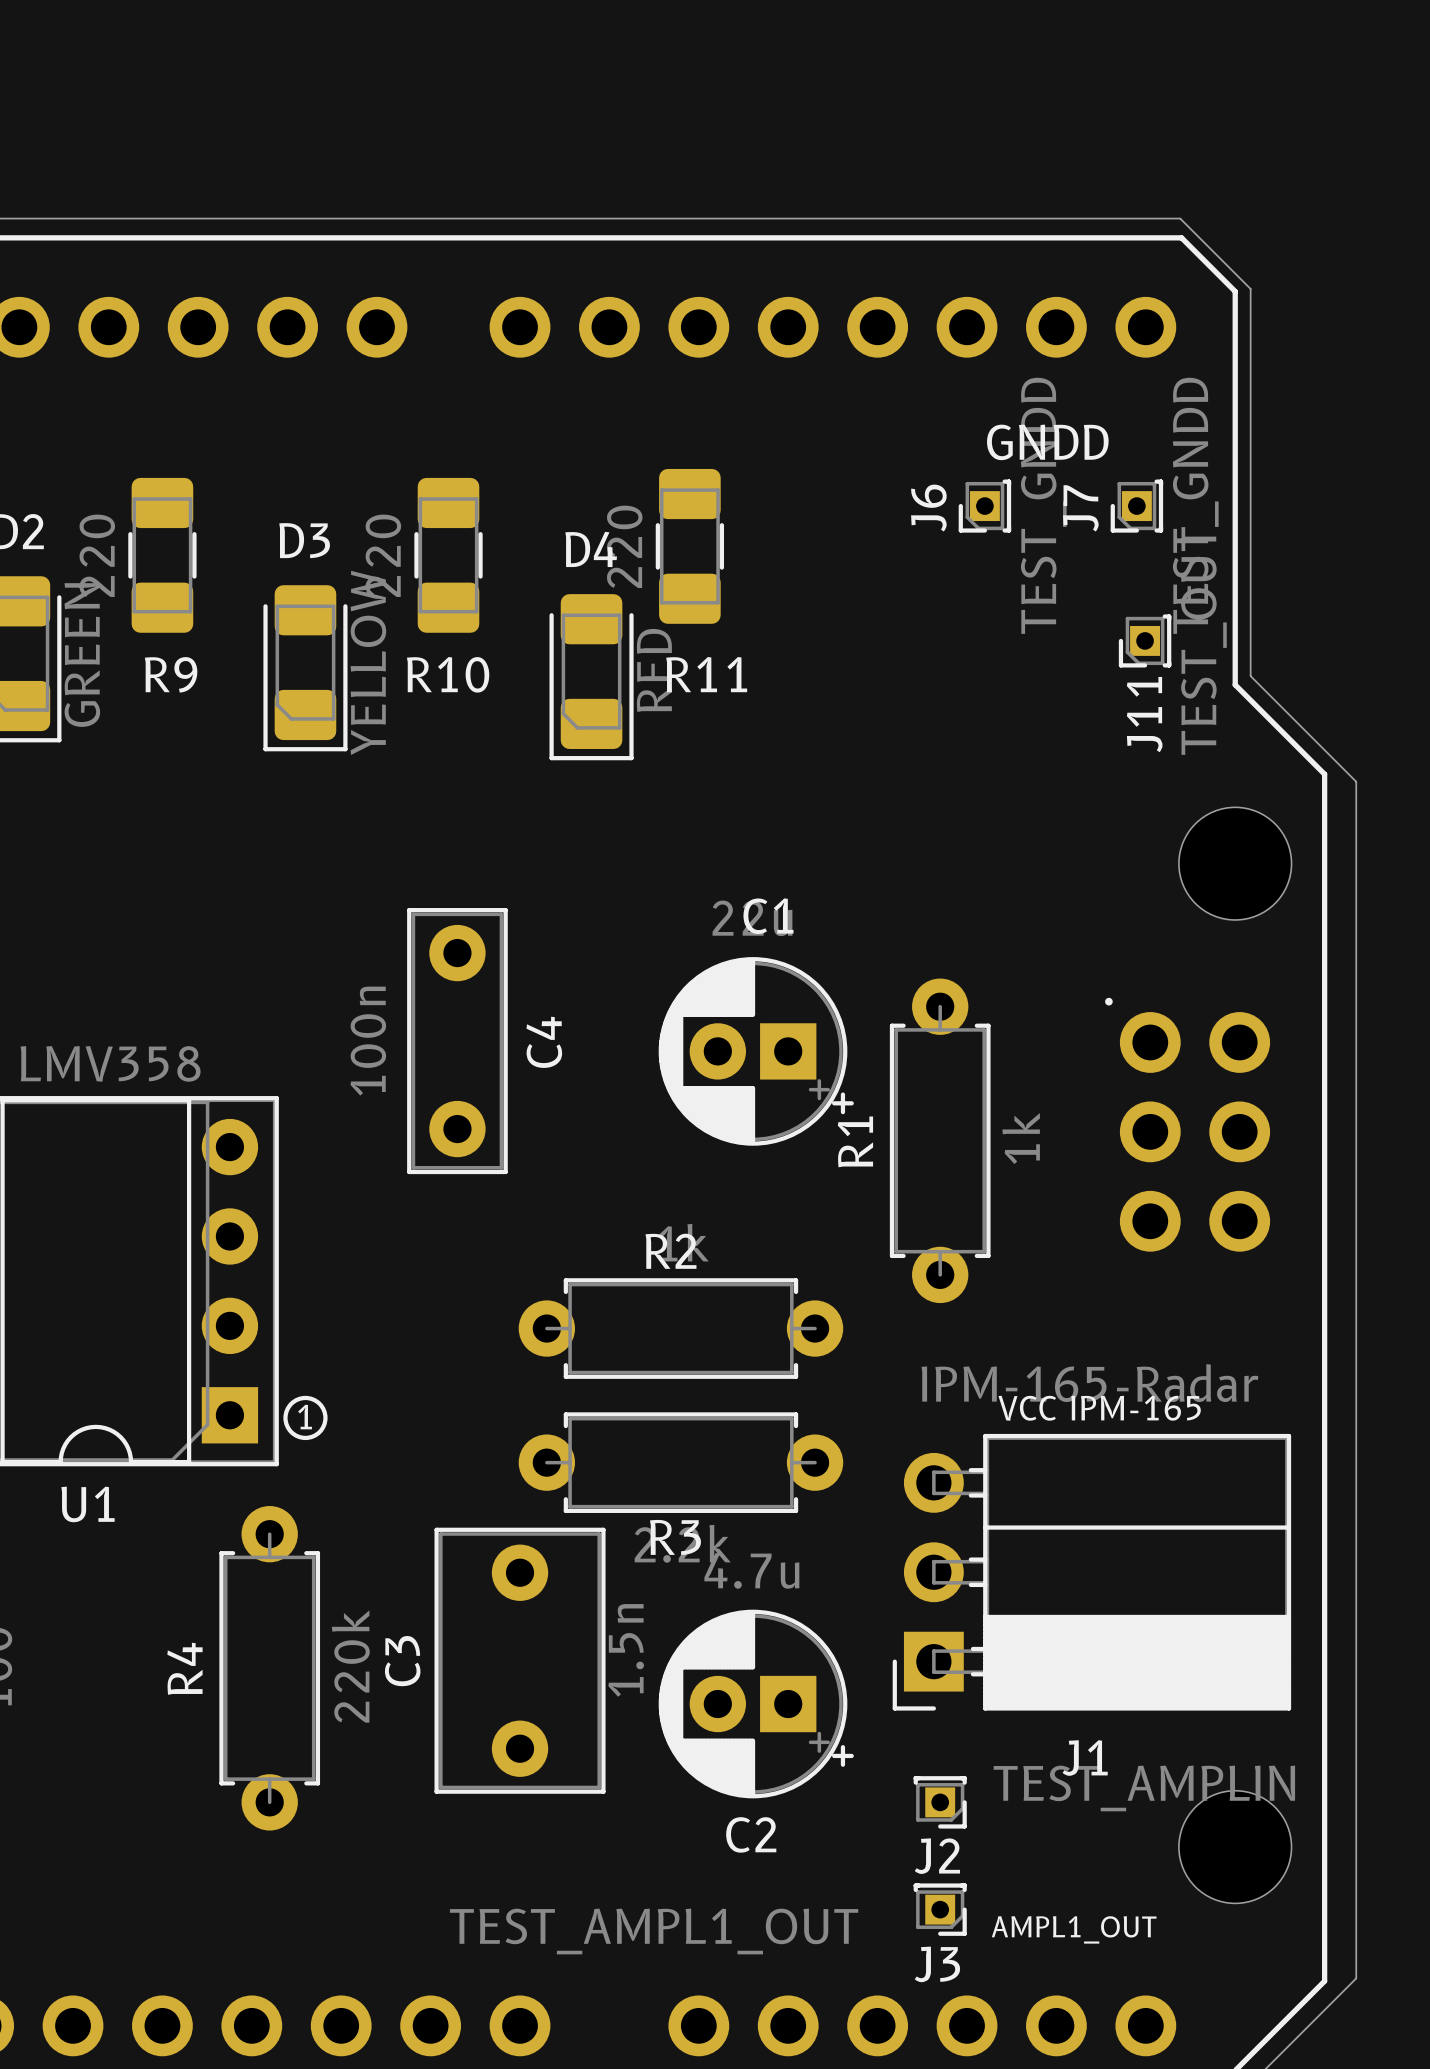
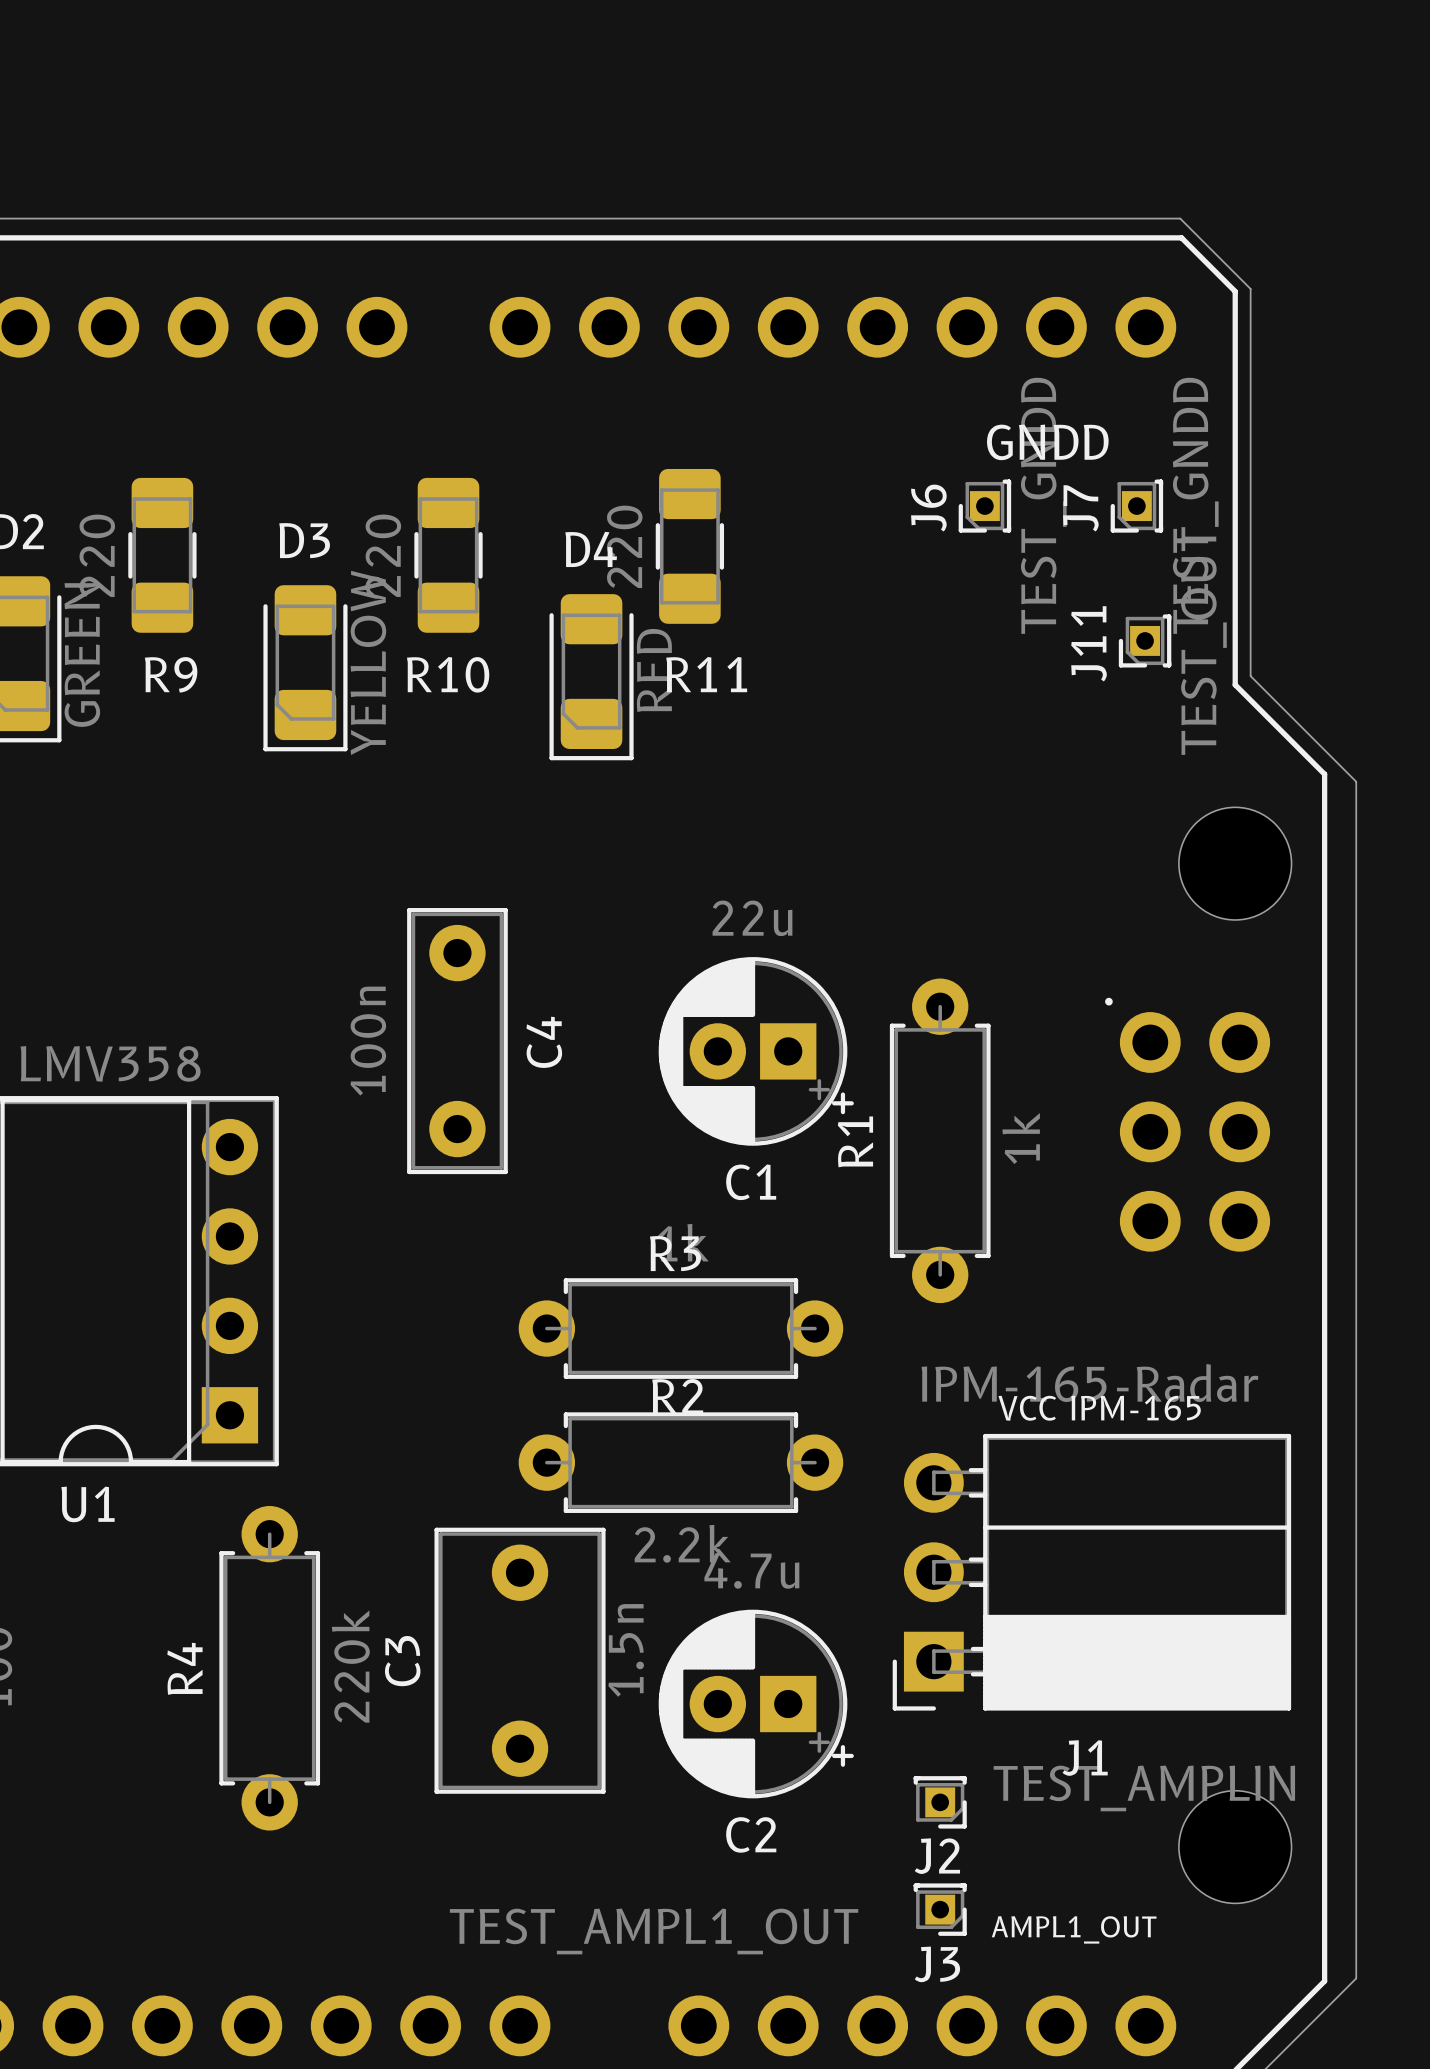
J11 name position: J11 (1144, 714) -> J11 (1089, 643)
C1 name position: C1 (768, 916) -> C1 (751, 1182)
R2 name position: R2 (670, 1251) -> R2 (677, 1396)
drawing: [283, 1395, 328, 1441] -> none
text: 1 (305, 1417) -> none
R3 name position: R3 (675, 1537) -> R3 (675, 1253)

